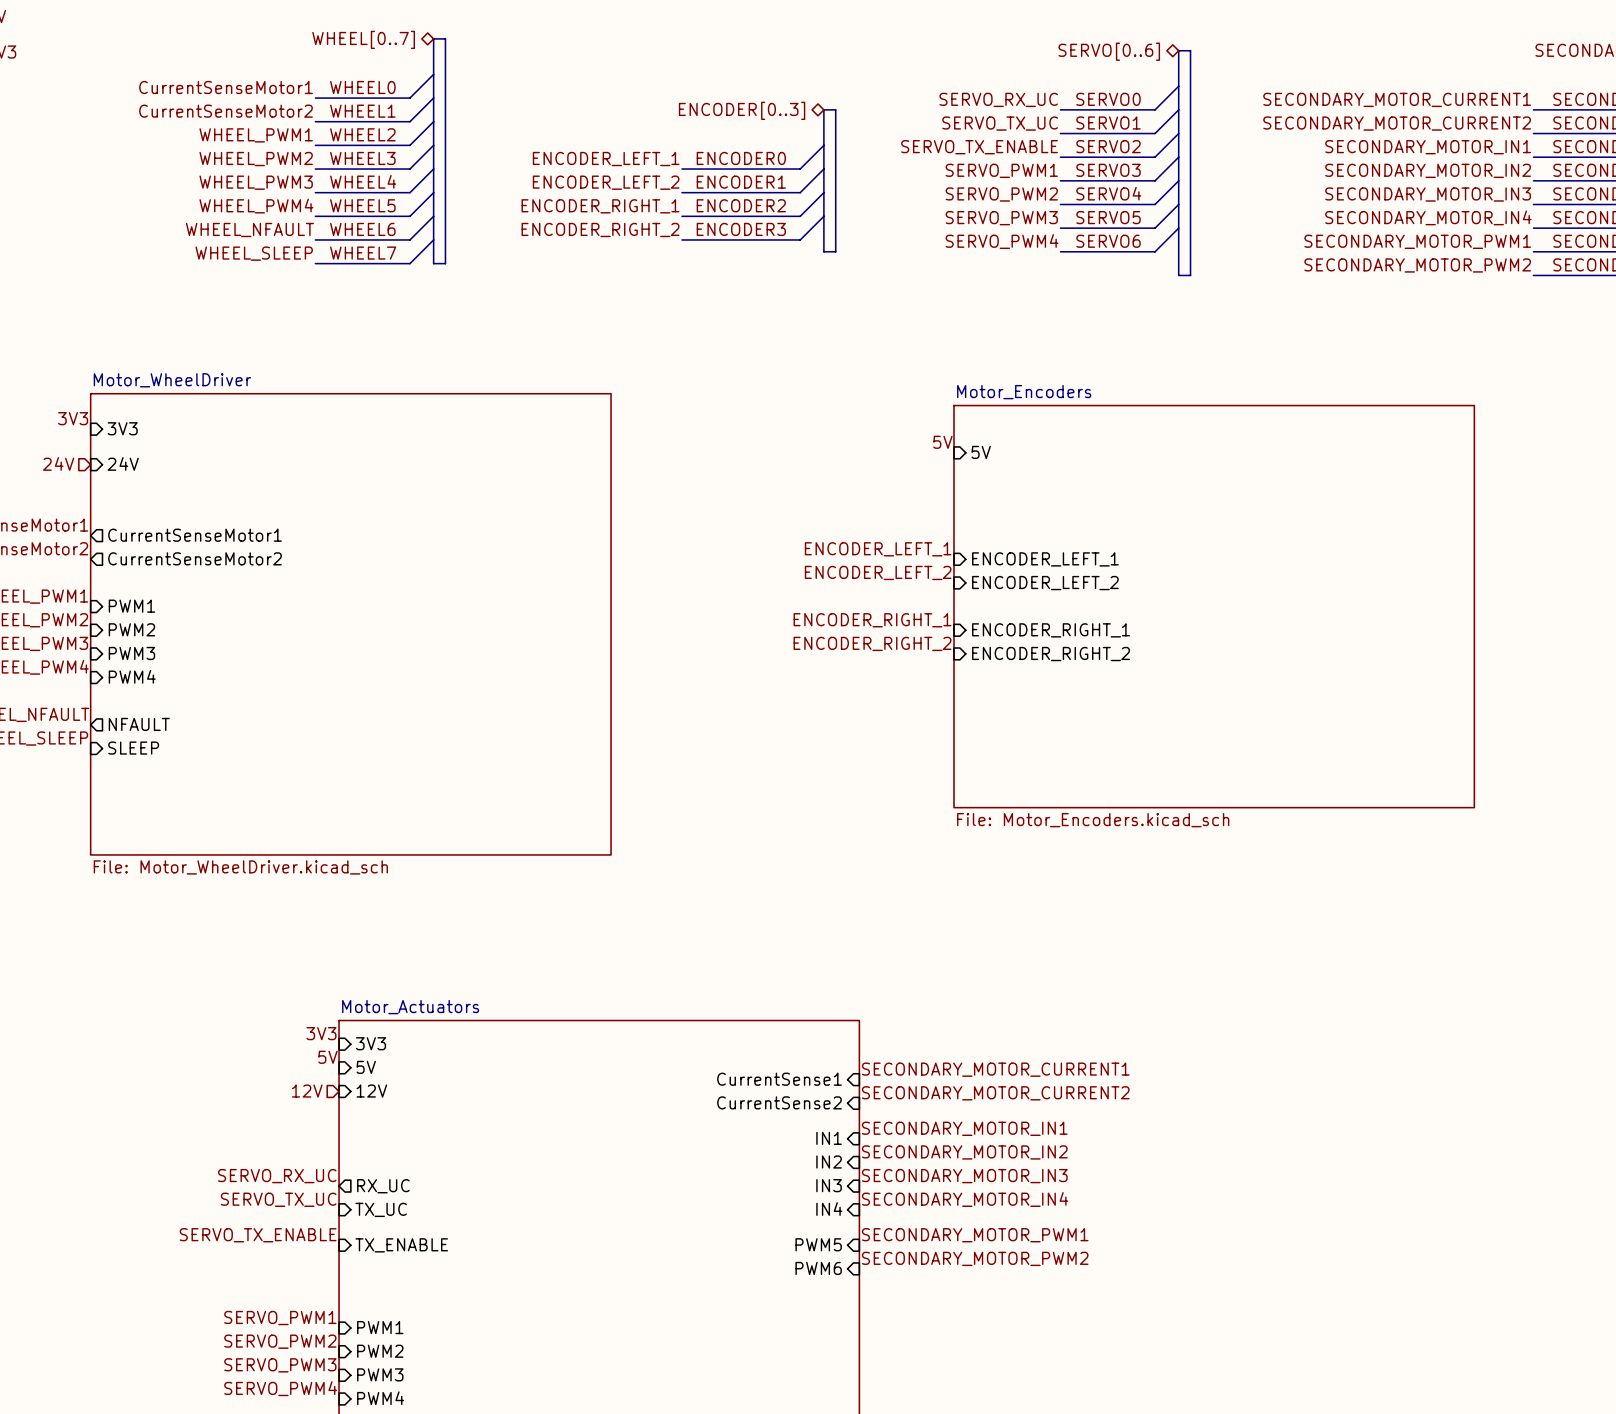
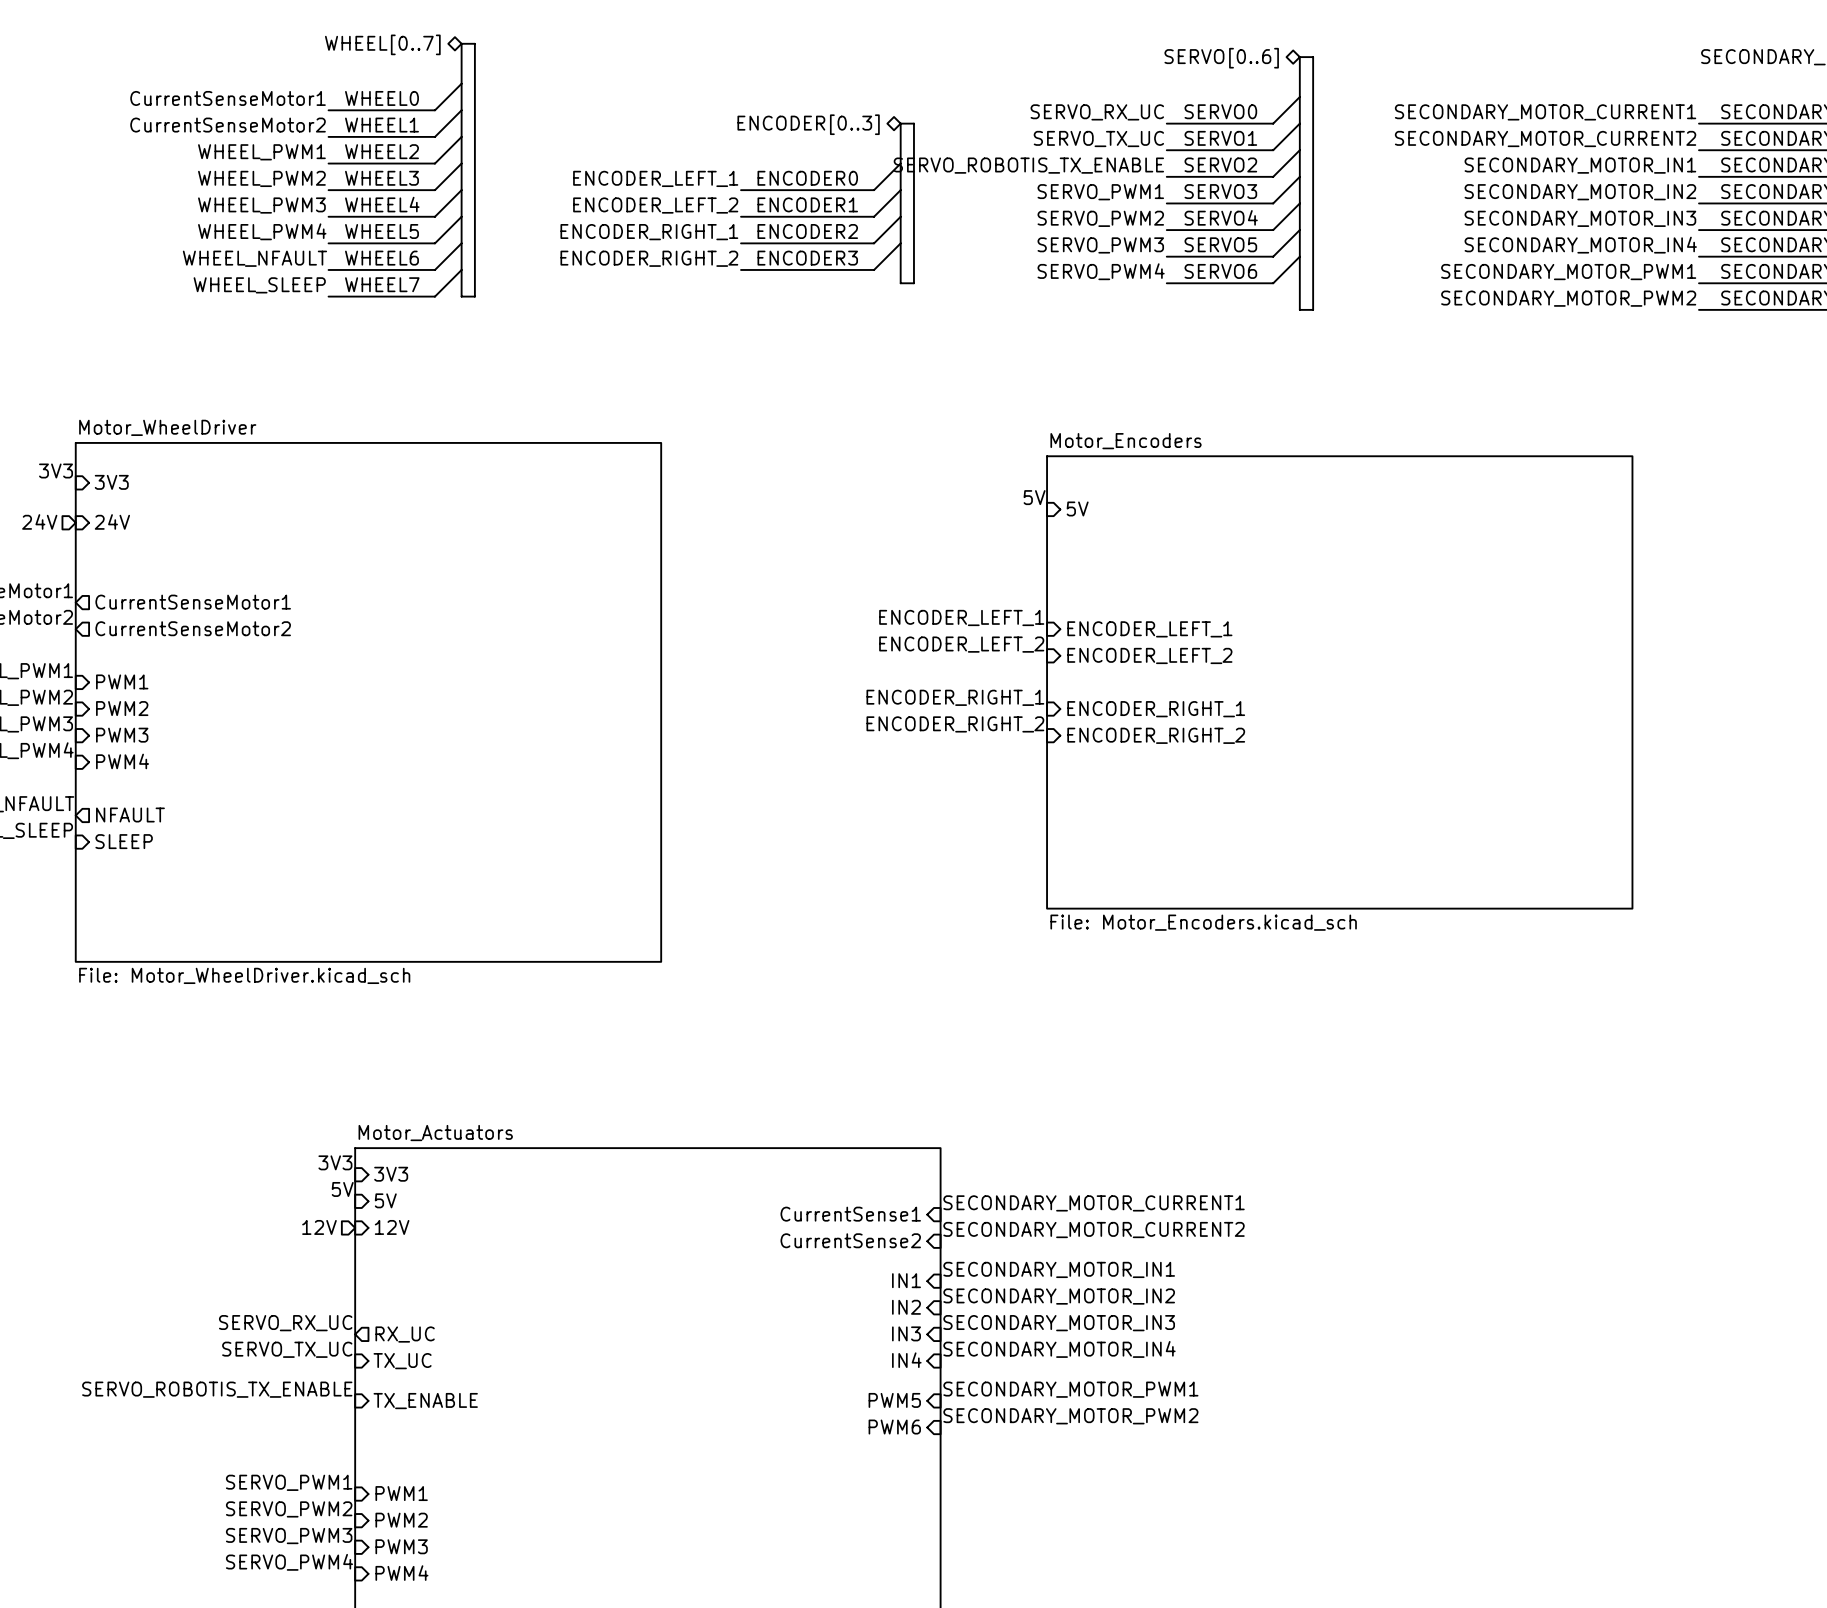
label: SERVO_TX_ENABLE (979, 147) -> SERVO_ROBOTIS_TX_ENABLE (1028, 165)
label: SERVO_TX_ENABLE (258, 1235) -> SERVO_ROBOTIS_TX_ENABLE (217, 1389)

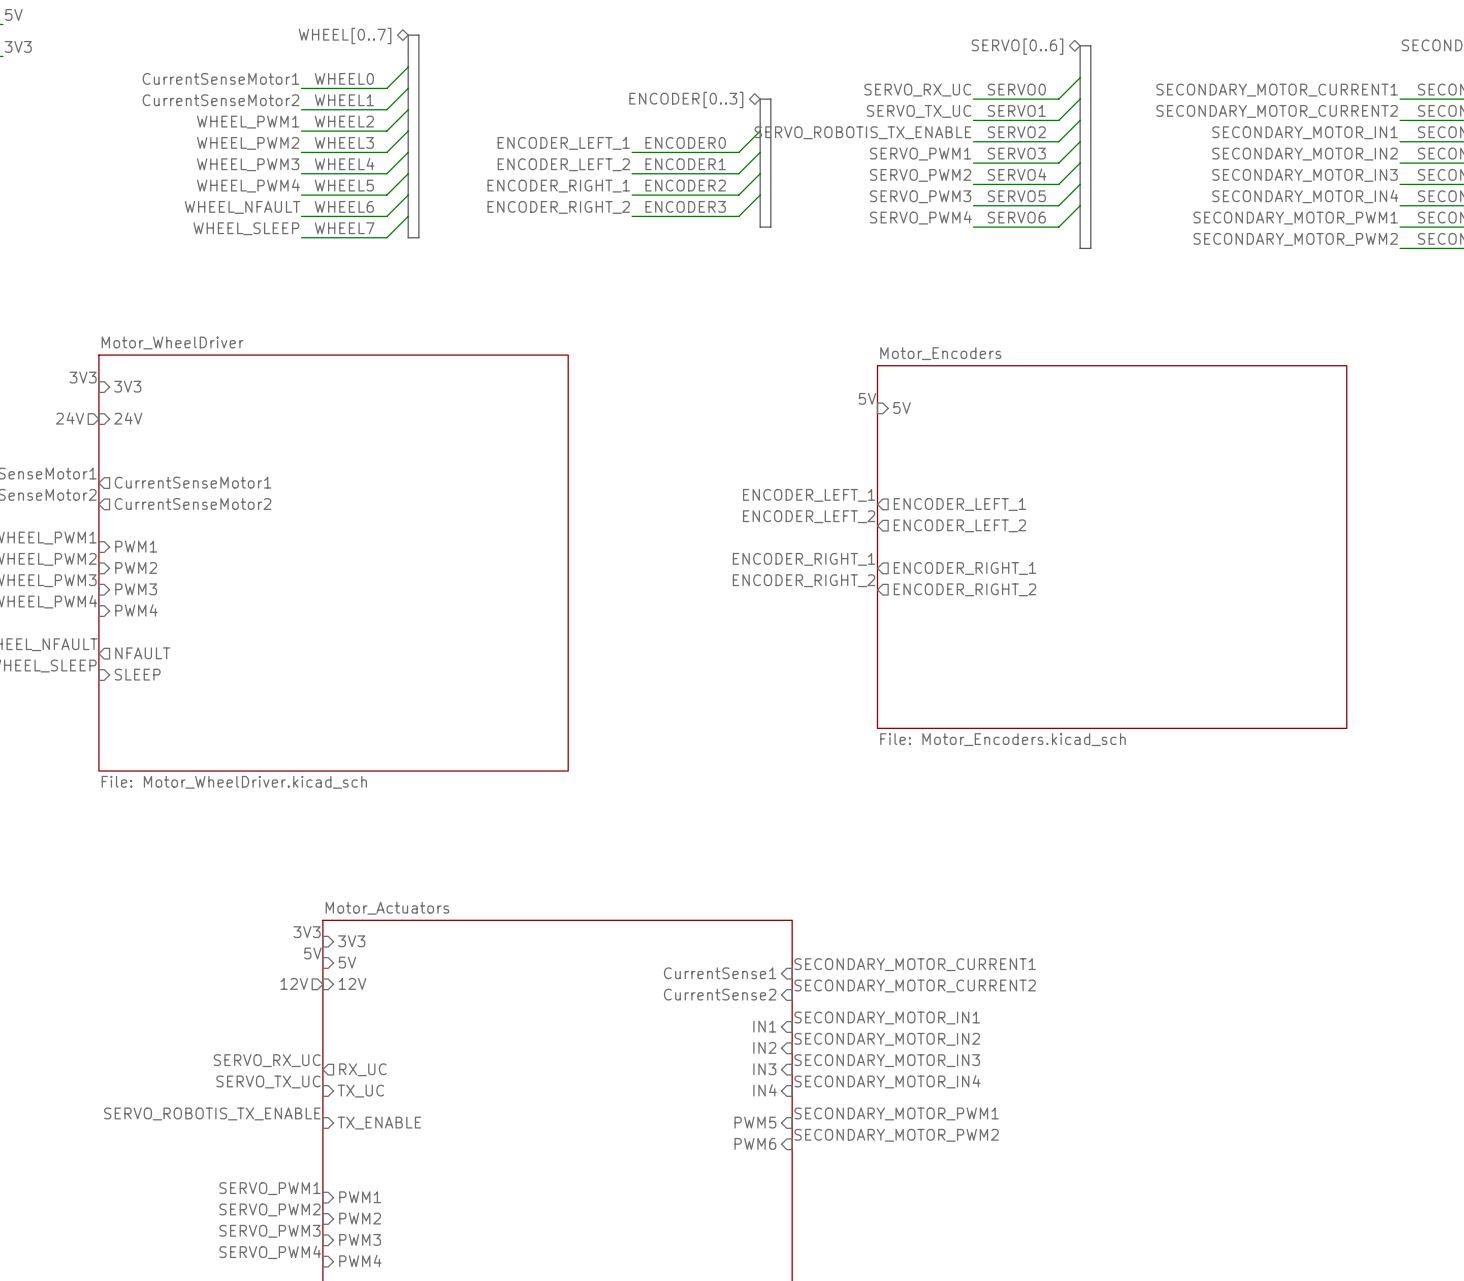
sheet pin shape: input (1149, 629) -> output (959, 504)
sheet pin shape: input (1149, 655) -> output (959, 525)
sheet pin shape: input (1156, 709) -> output (965, 568)
sheet pin shape: input (1156, 735) -> output (965, 589)

